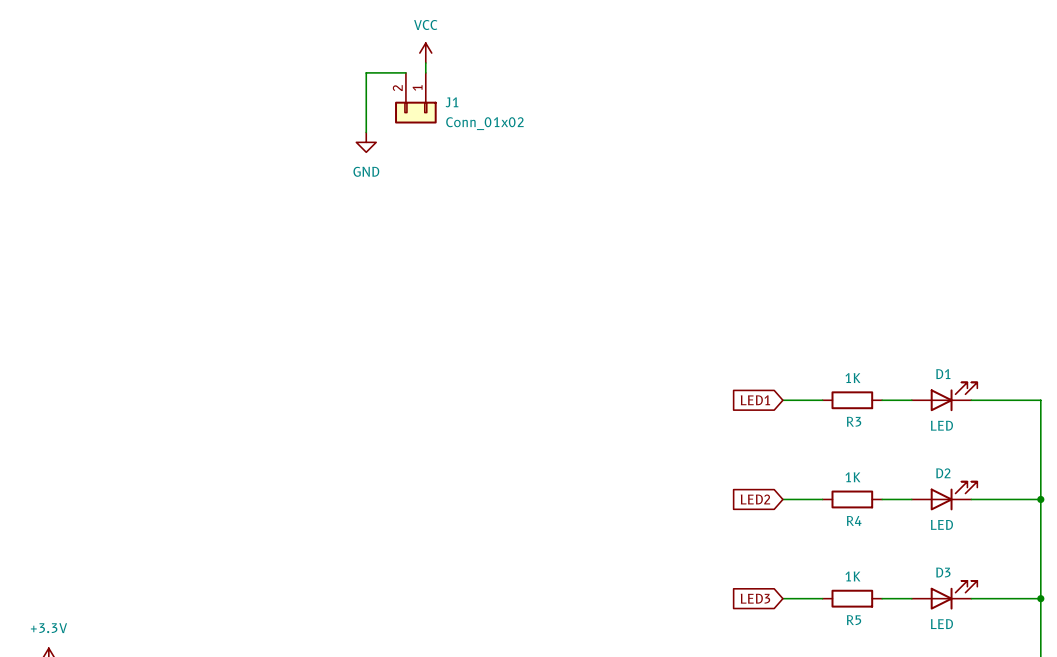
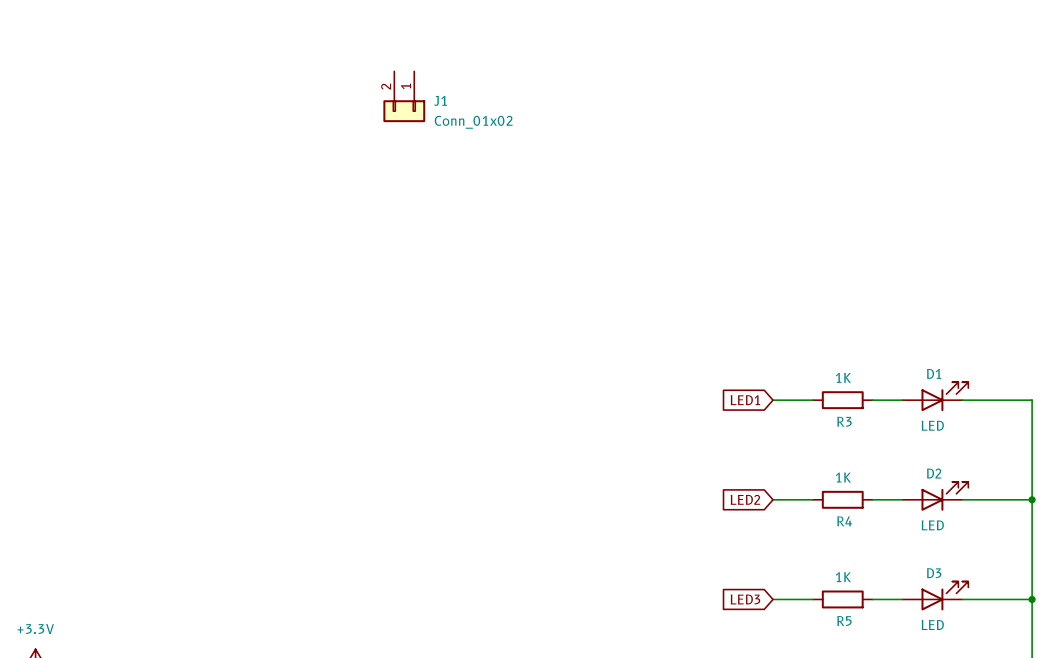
power symbol: VCC (425, 53) -> none
wire: (425, 62) (425, 72) -> none
wire: (405, 72) (366, 72) (366, 132) -> none
power symbol: GND (366, 142) -> none

